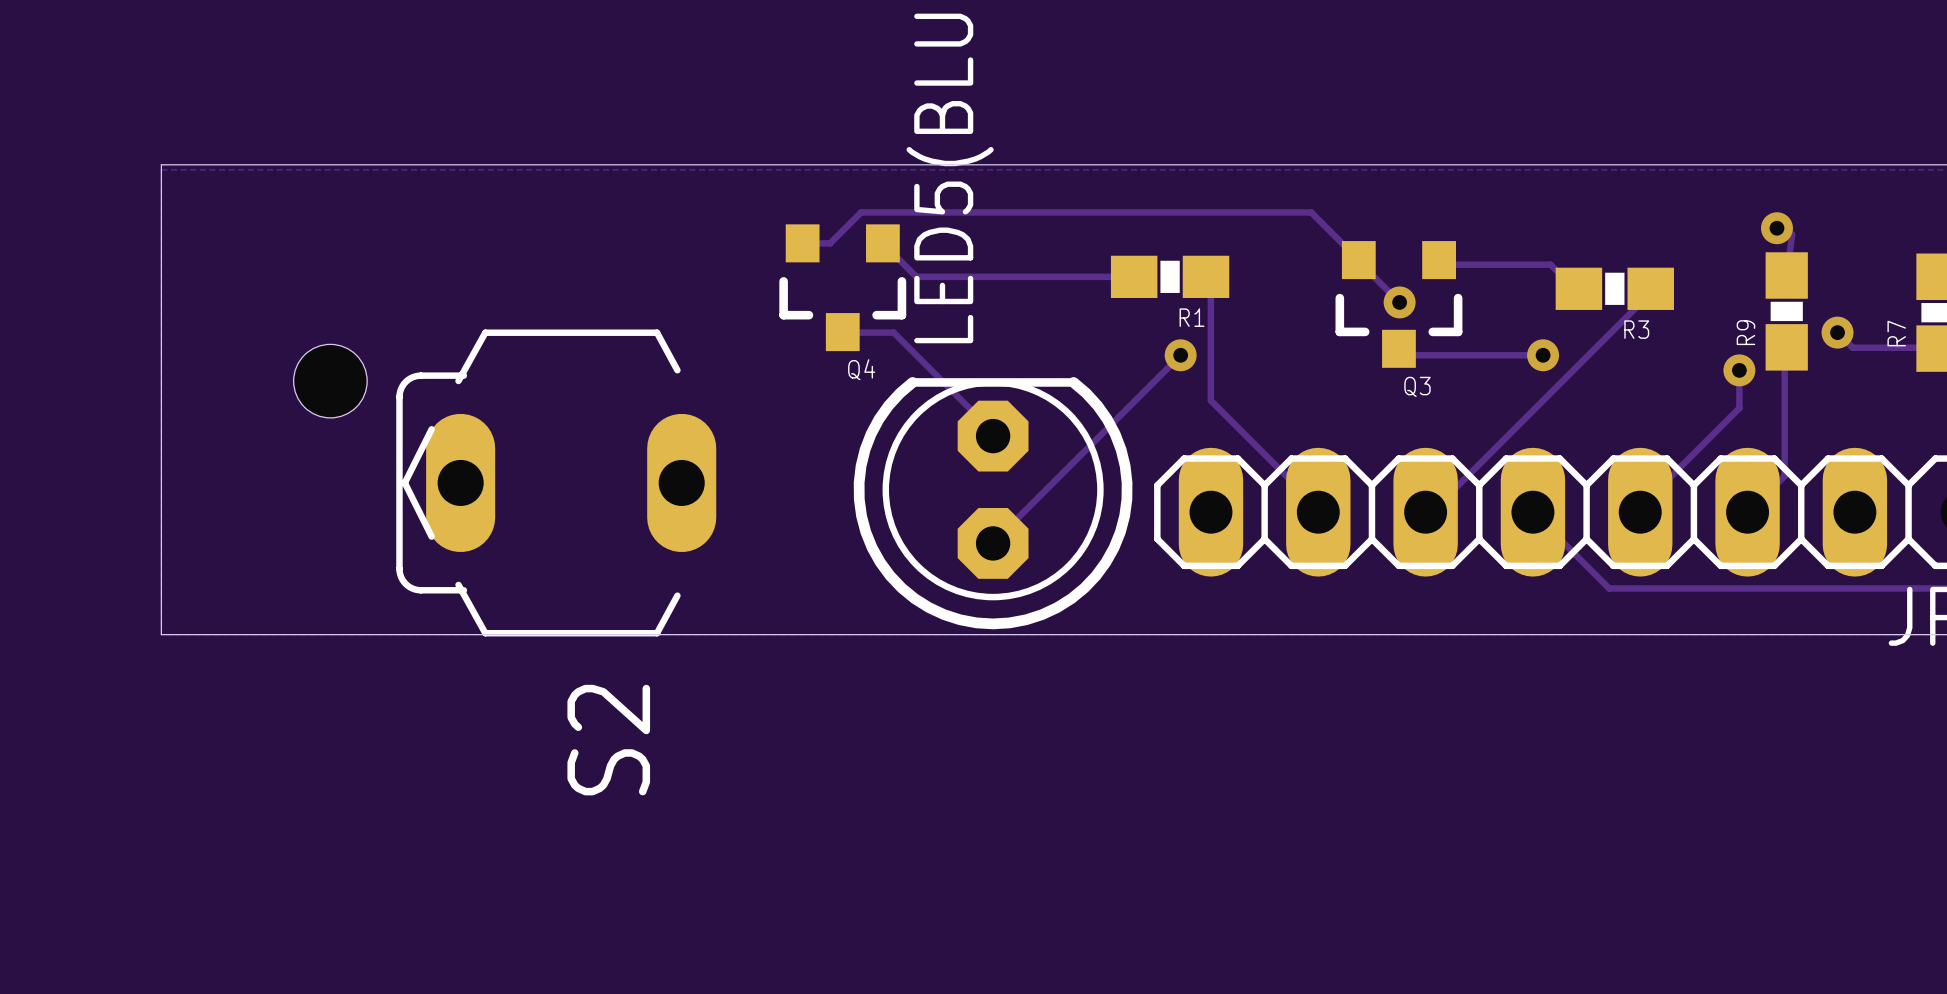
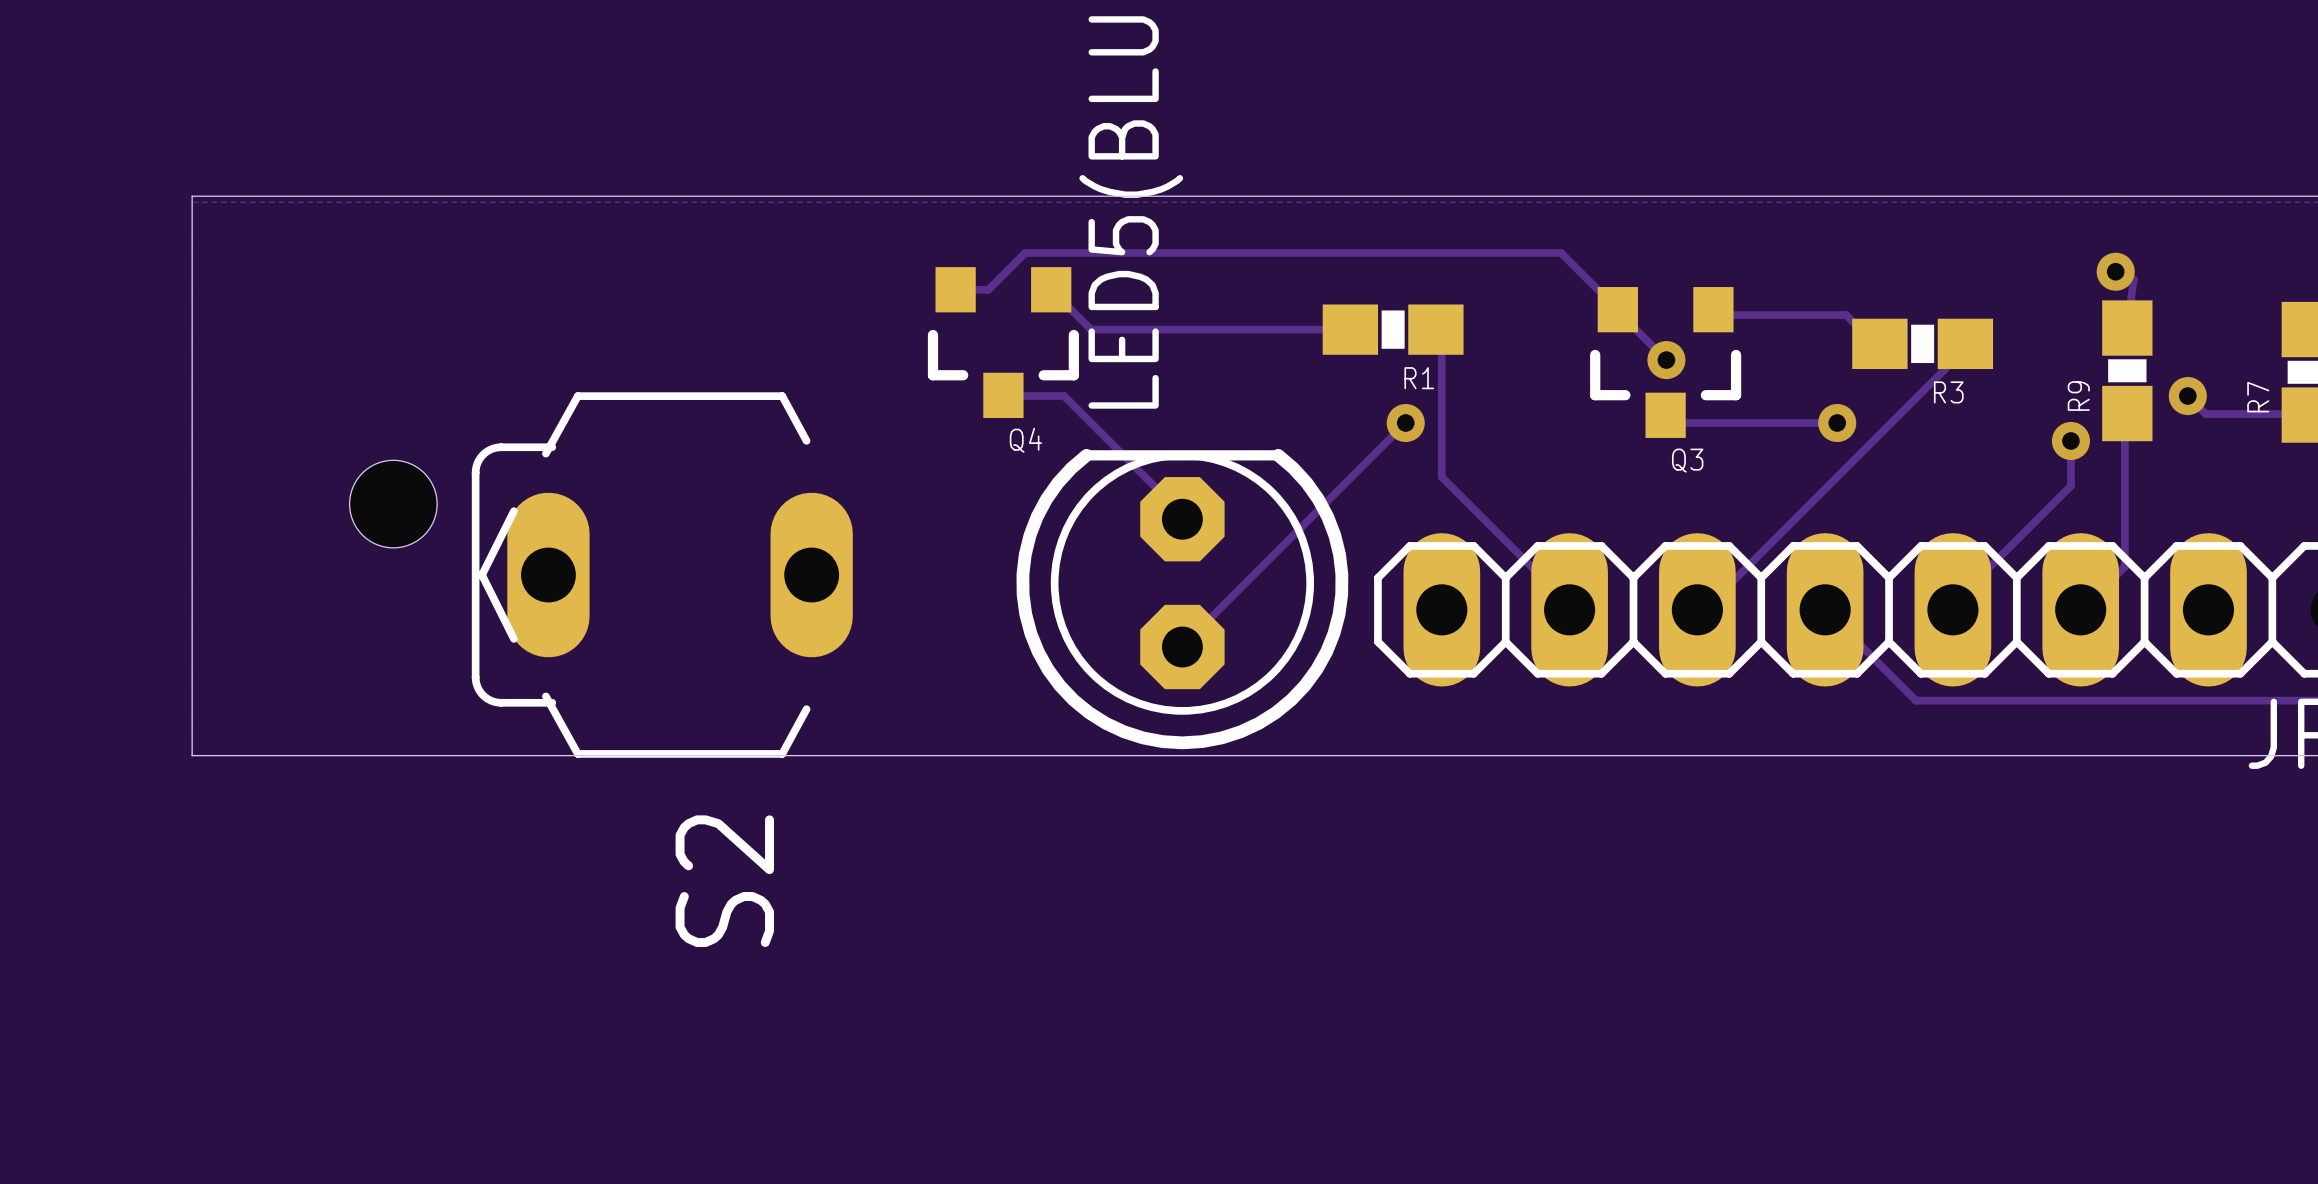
hole position: (330, 381) -> (393, 504)

